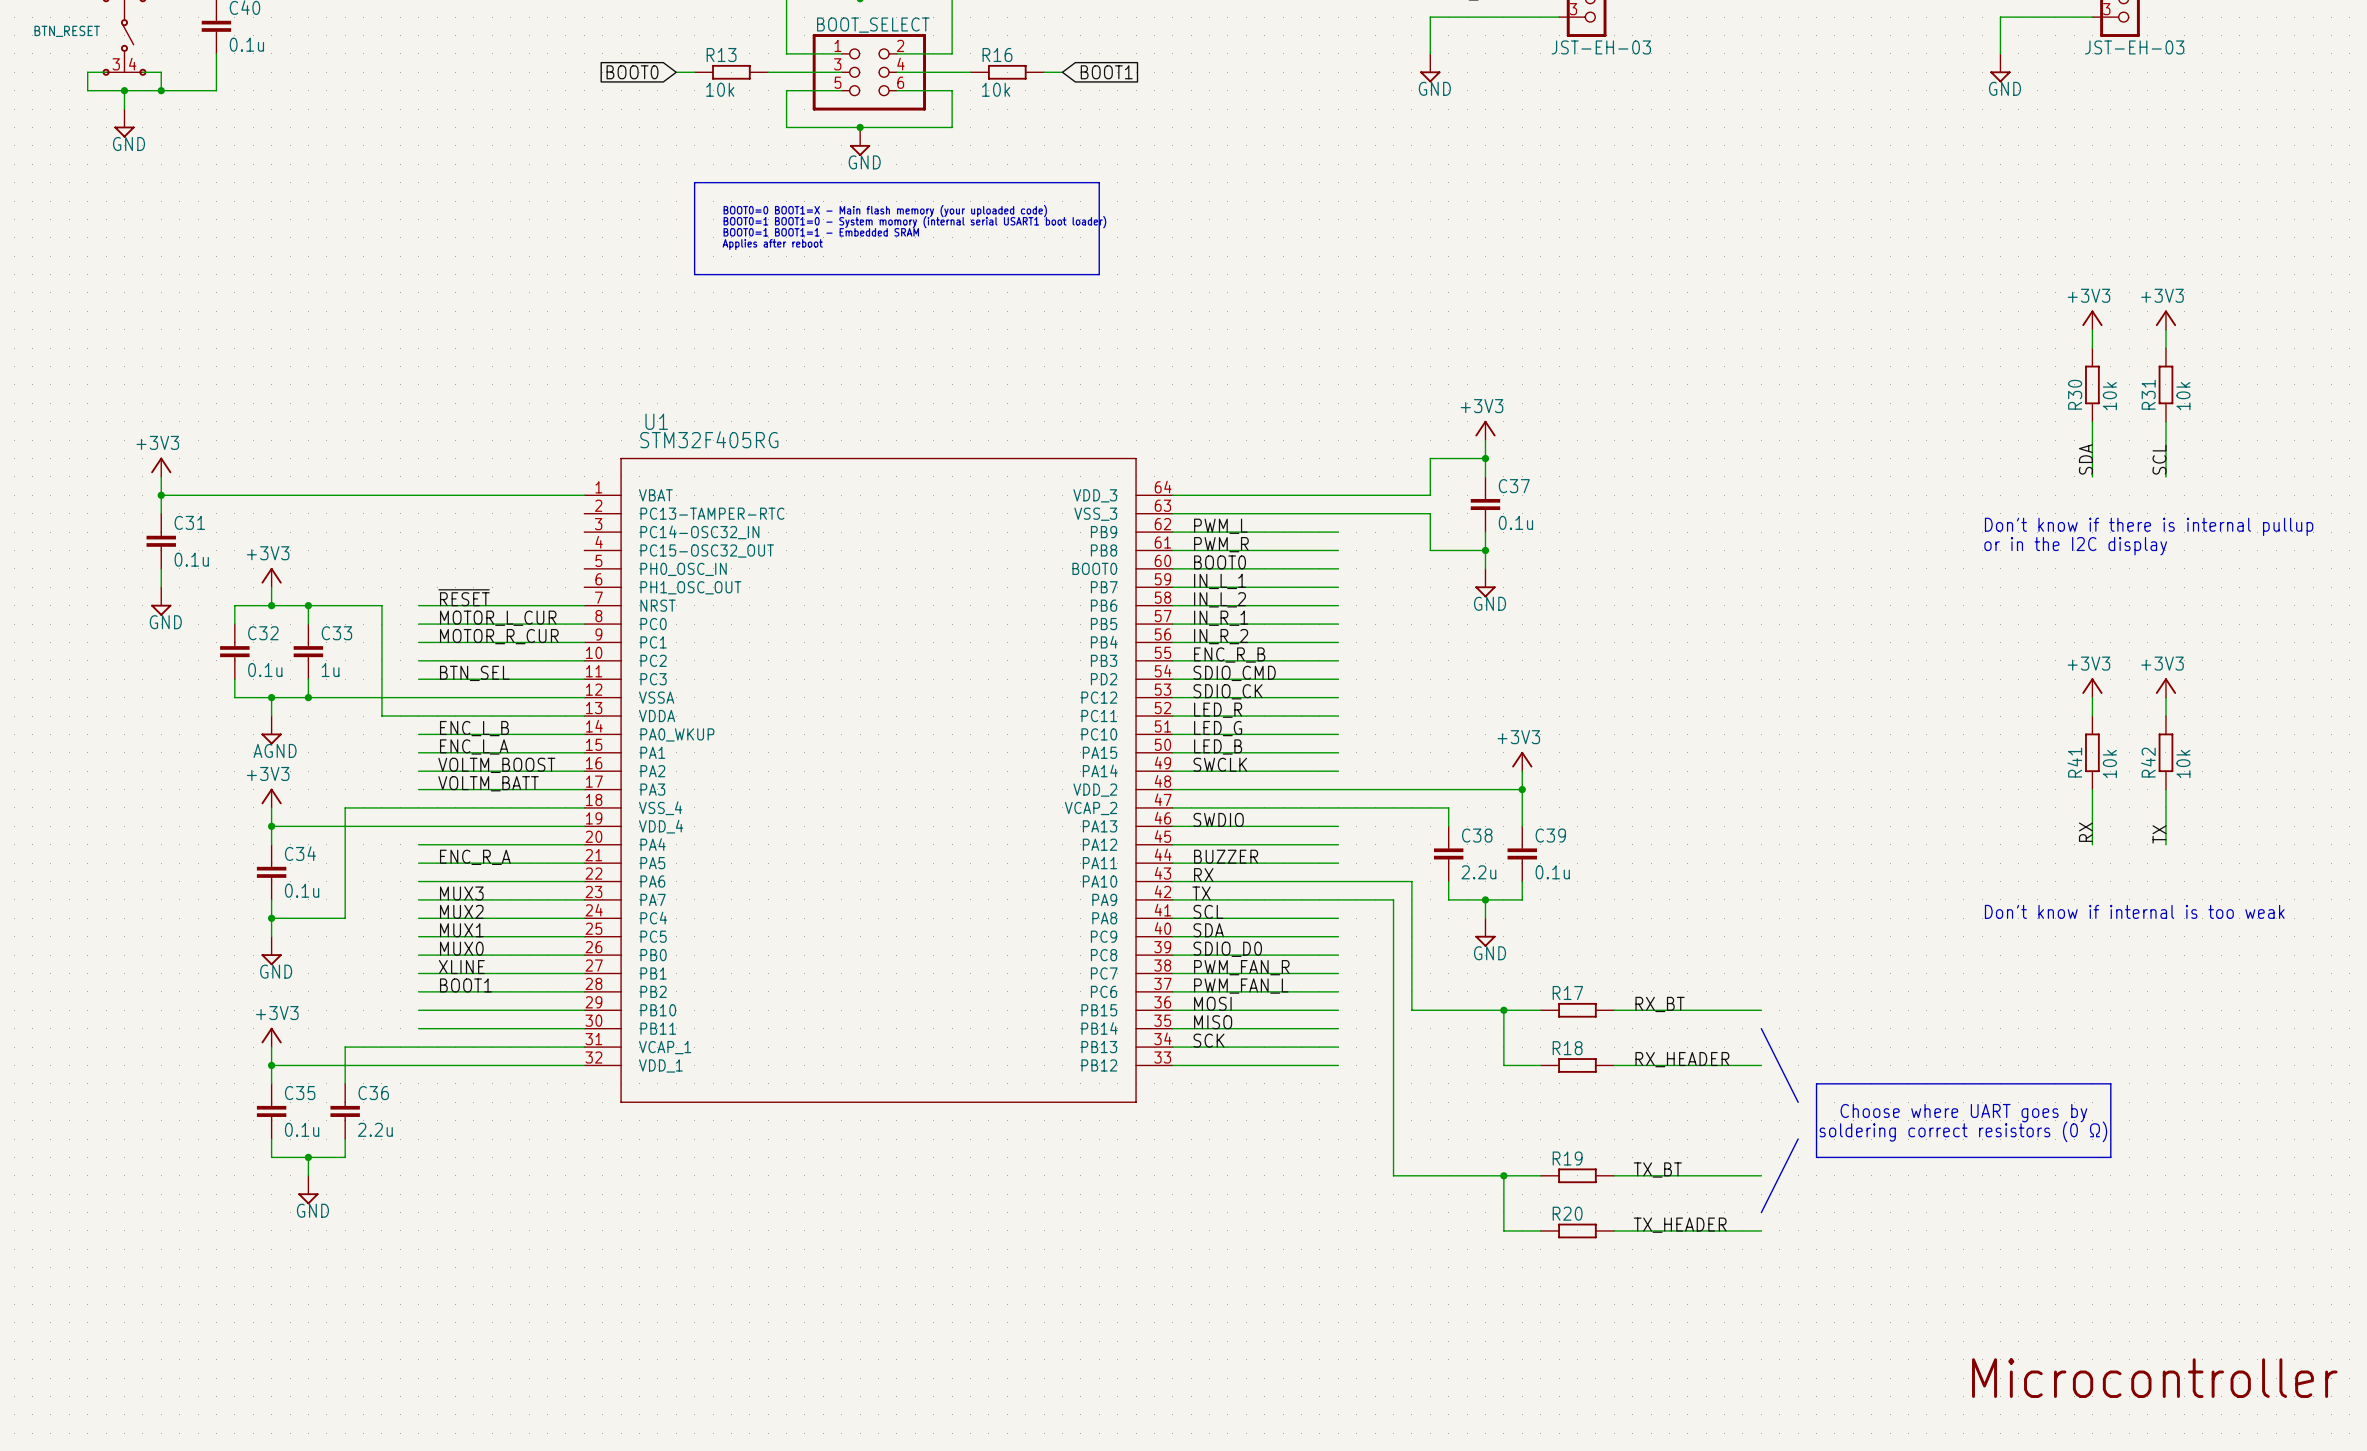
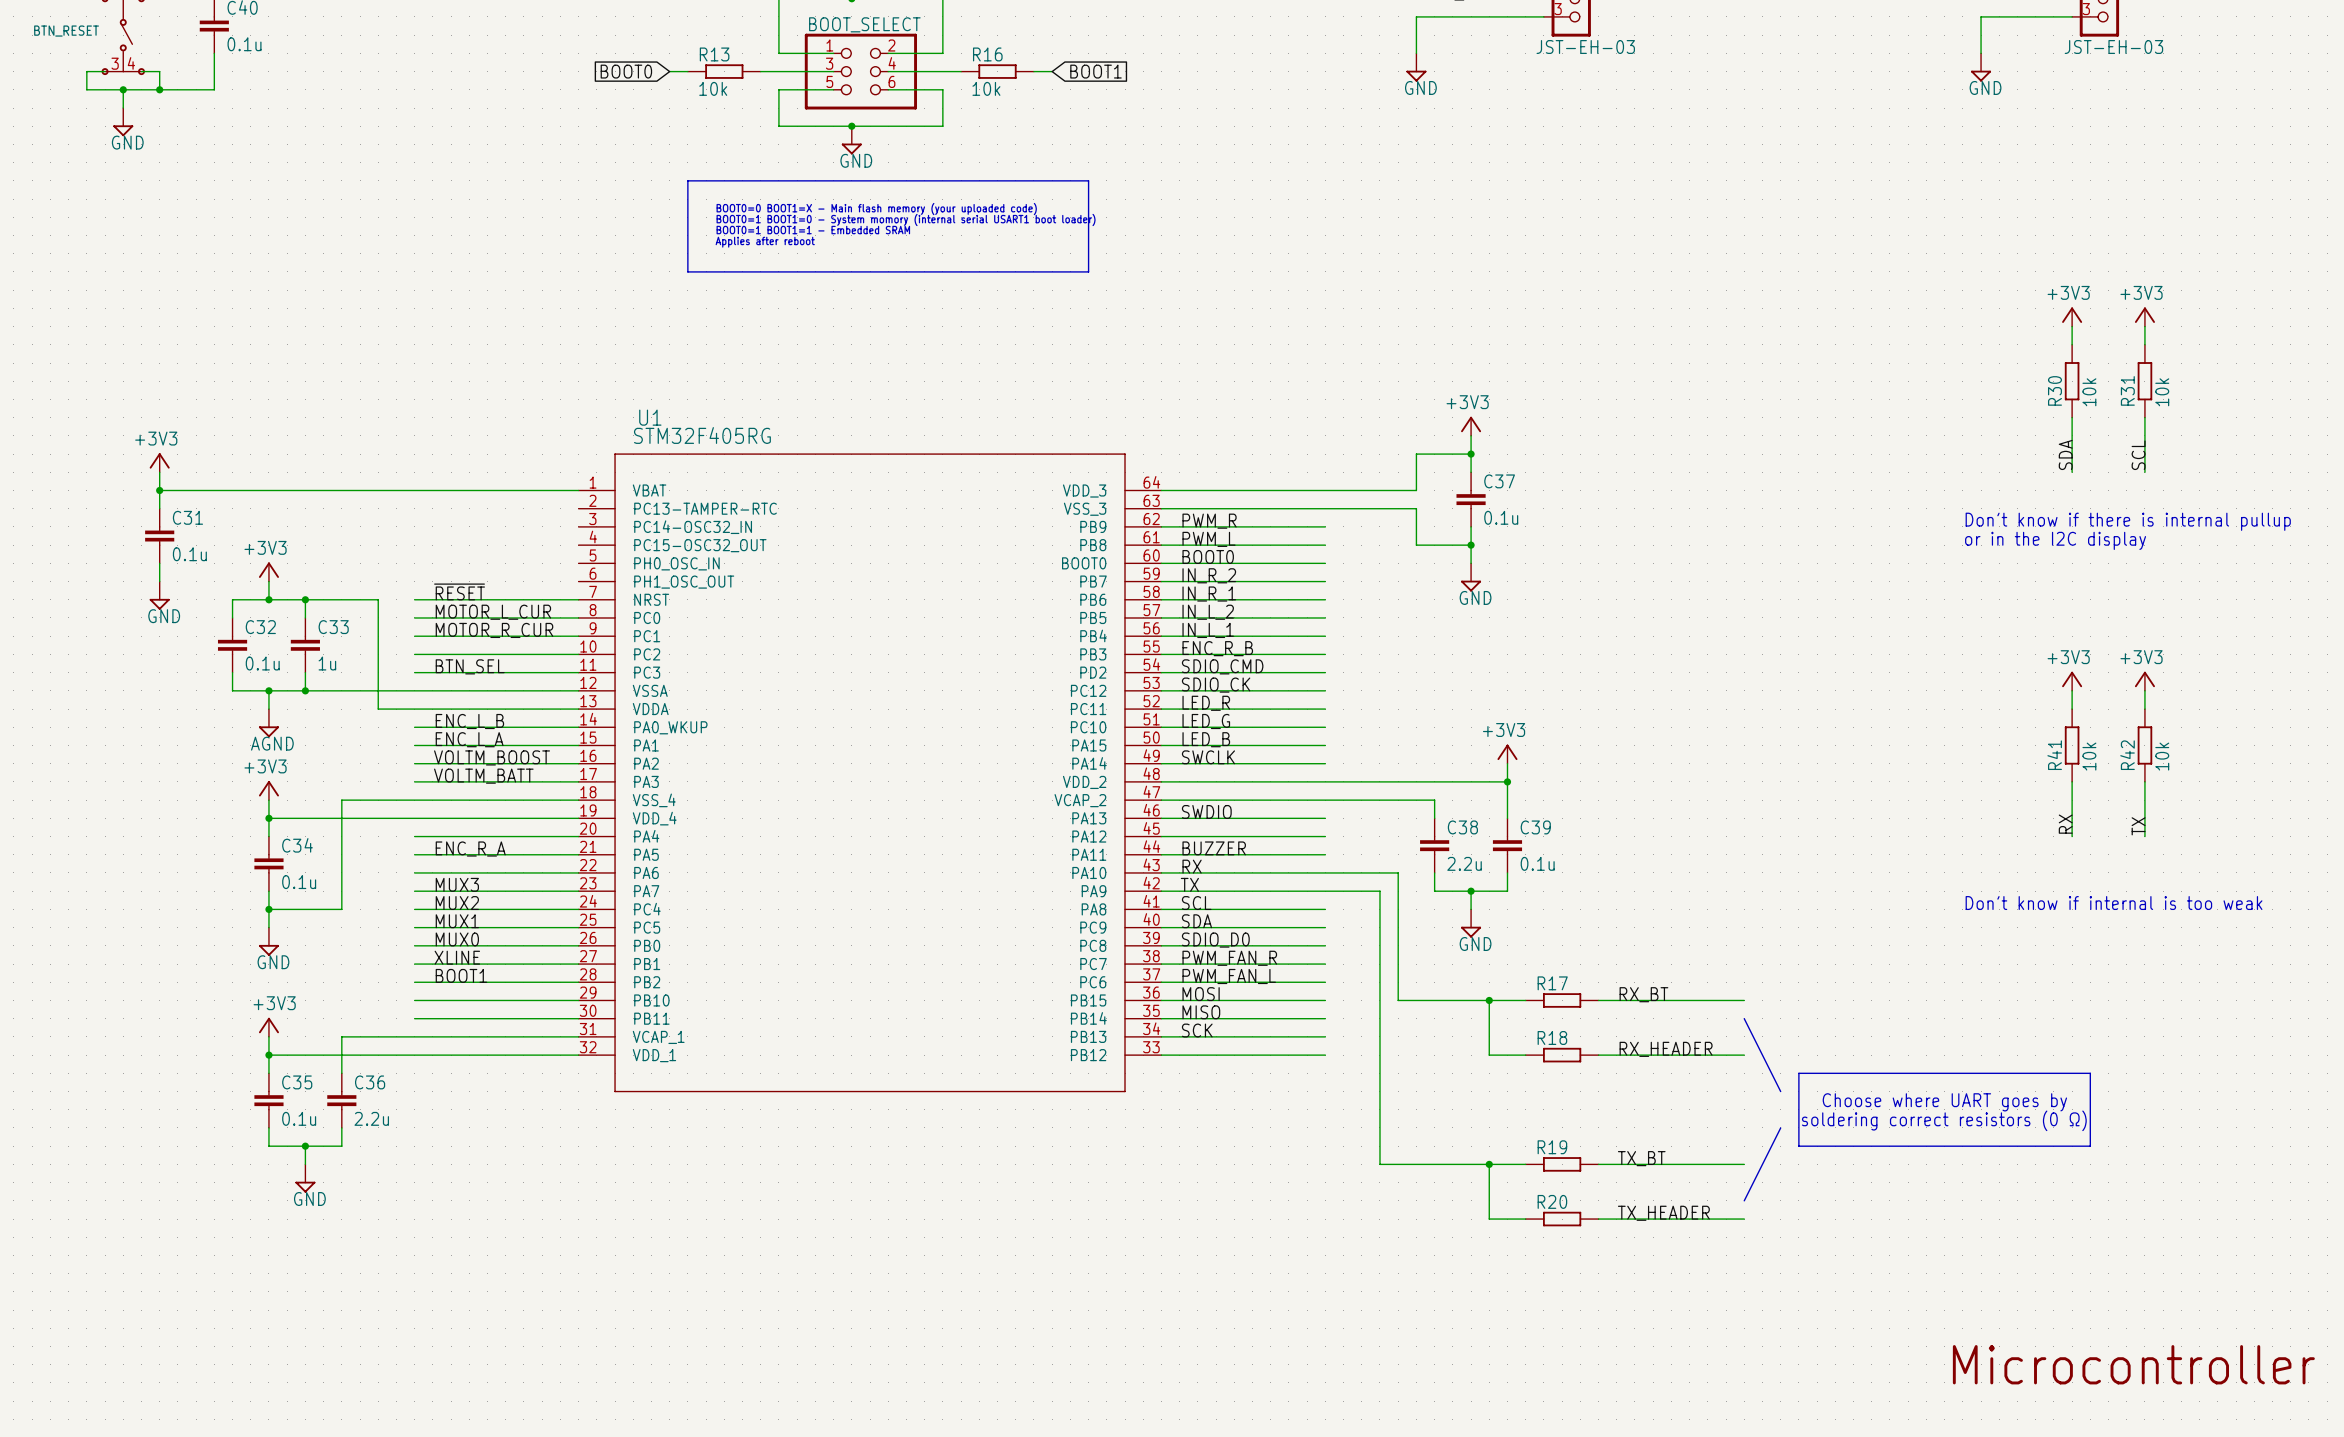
label: PWM_L (1220, 526) -> PWM_R (1209, 521)
label: PWM_R (1221, 544) -> PWM_L (1209, 539)
label: IN_L_1 (1220, 581) -> IN_R_2 (1209, 575)
label: IN_L_2 (1220, 599) -> IN_R_1 (1209, 594)
label: IN_R_1 (1221, 618) -> IN_L_2 (1208, 612)
label: IN_R_2 (1221, 636) -> IN_L_1 (1208, 630)

